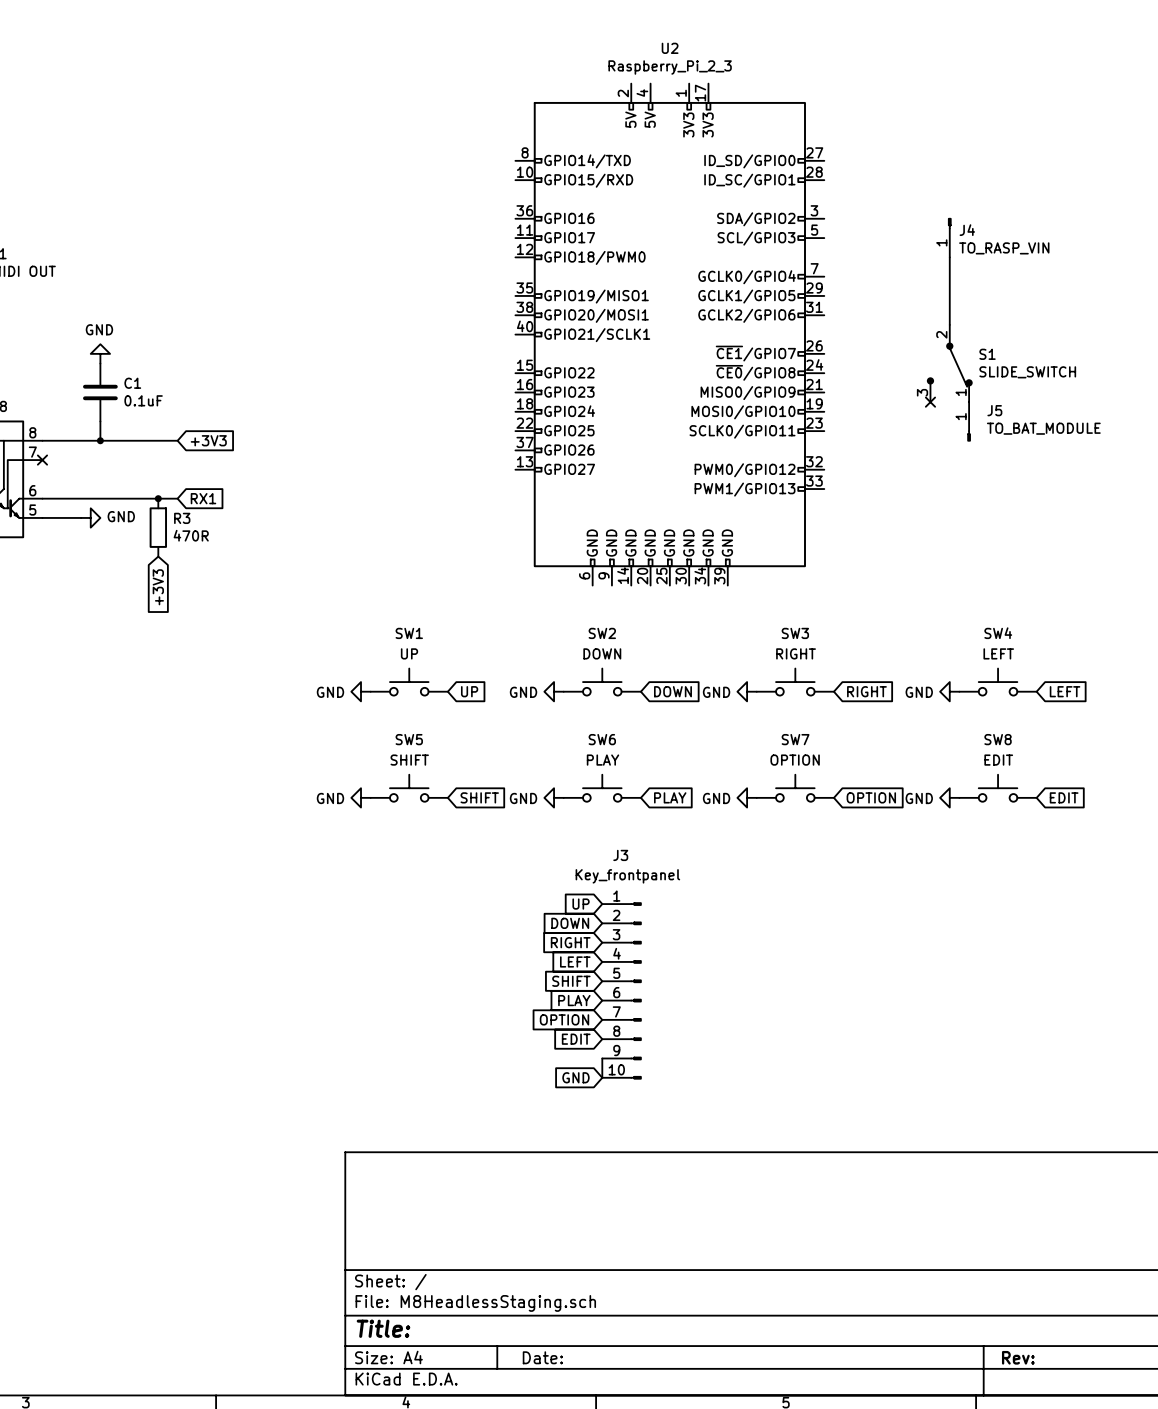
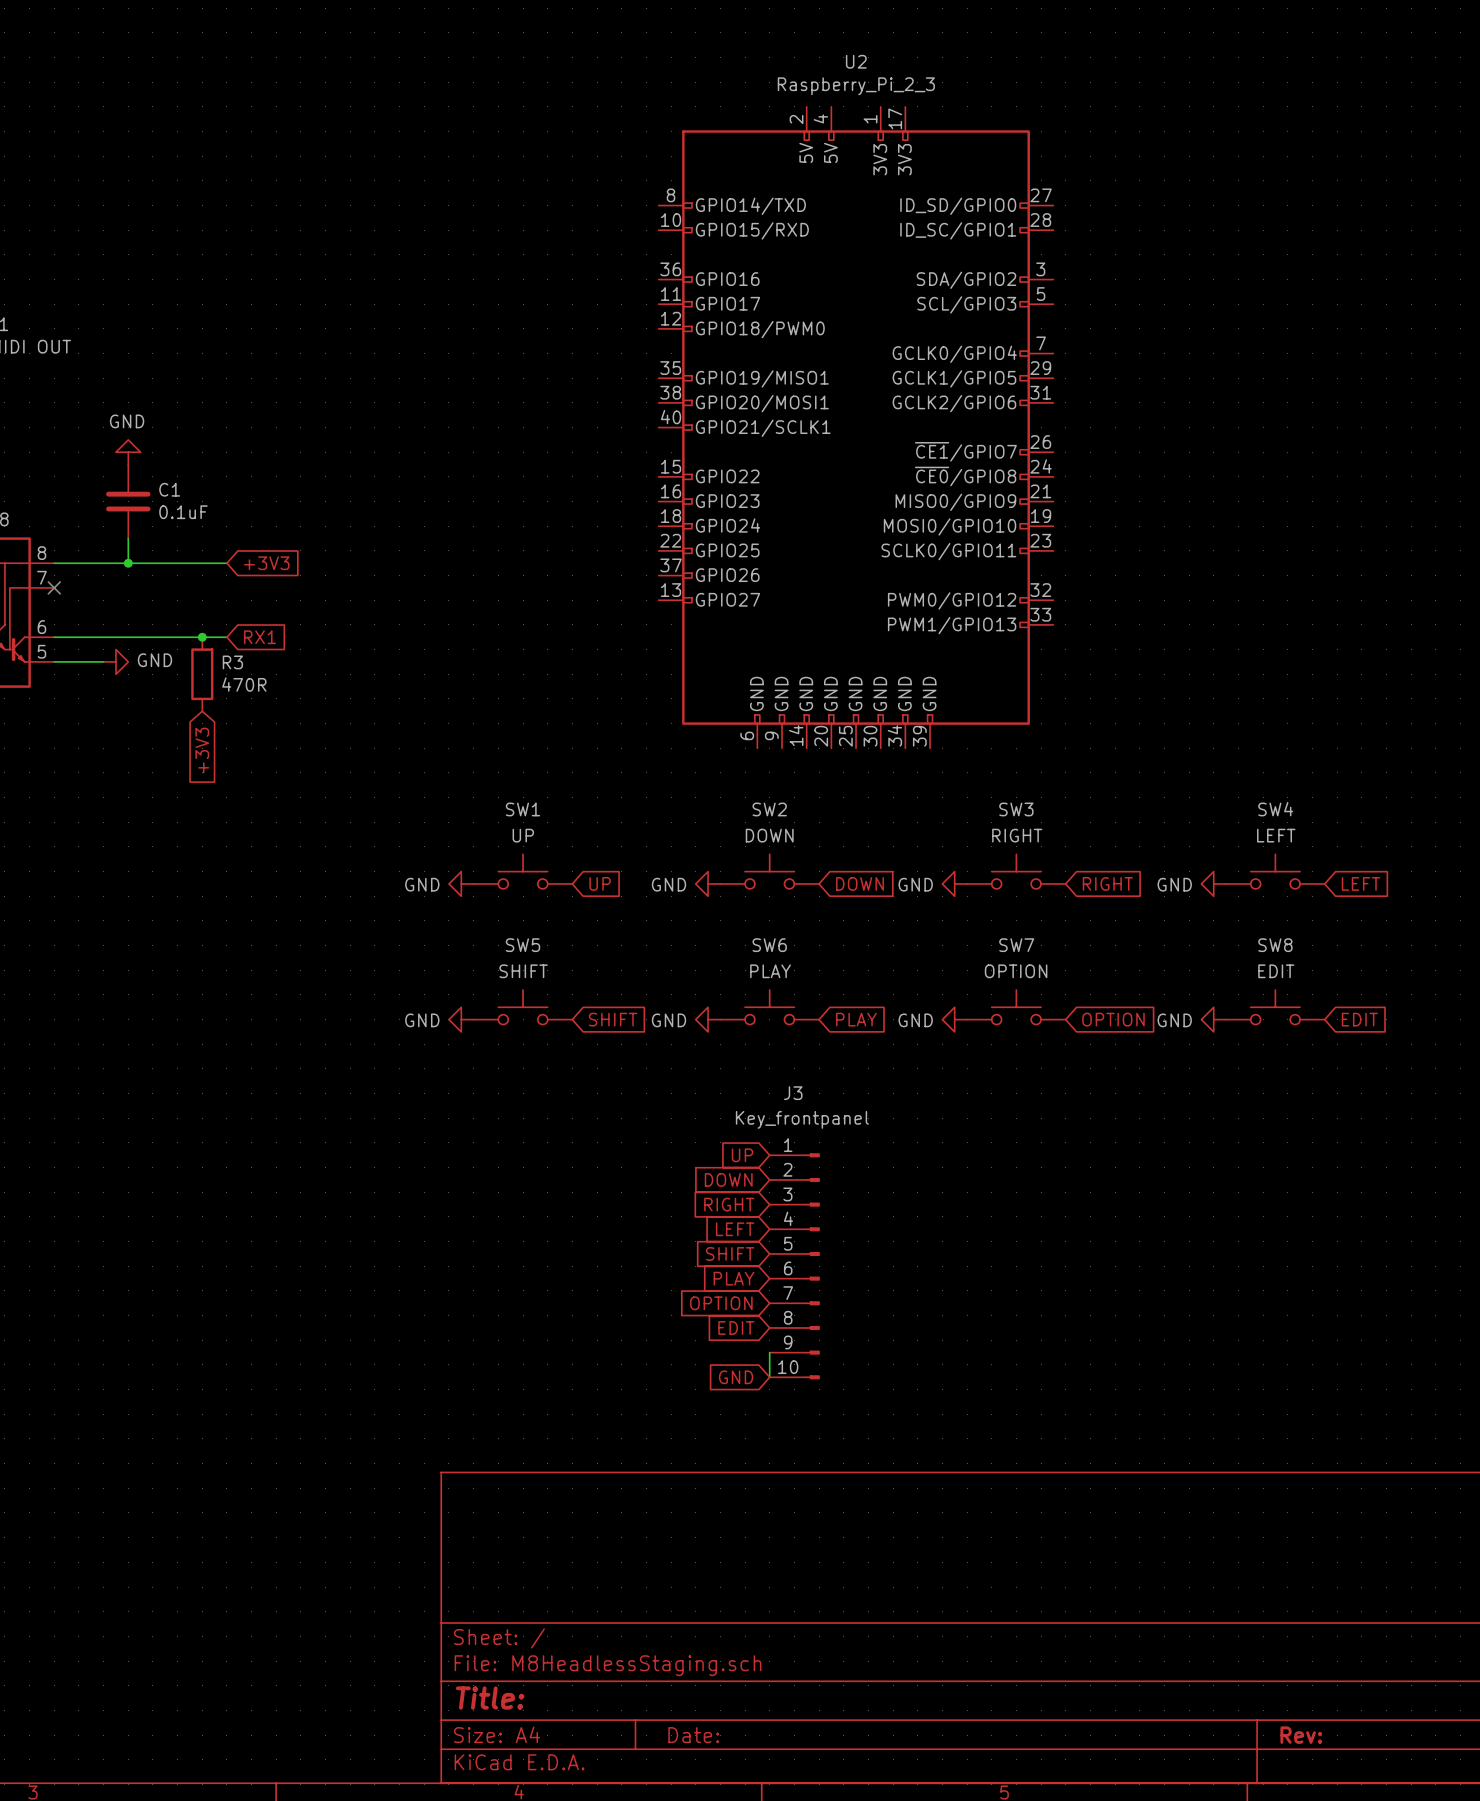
J4: TO_RASP_VIN (949, 237) -> none
wire: (949, 257) (949, 324) -> none
S1: SLIDE_SWITCH (949, 363) -> none
no-connect mark: (930, 402) -> none
J5: TO_BAT_MODULE (969, 421) -> none

